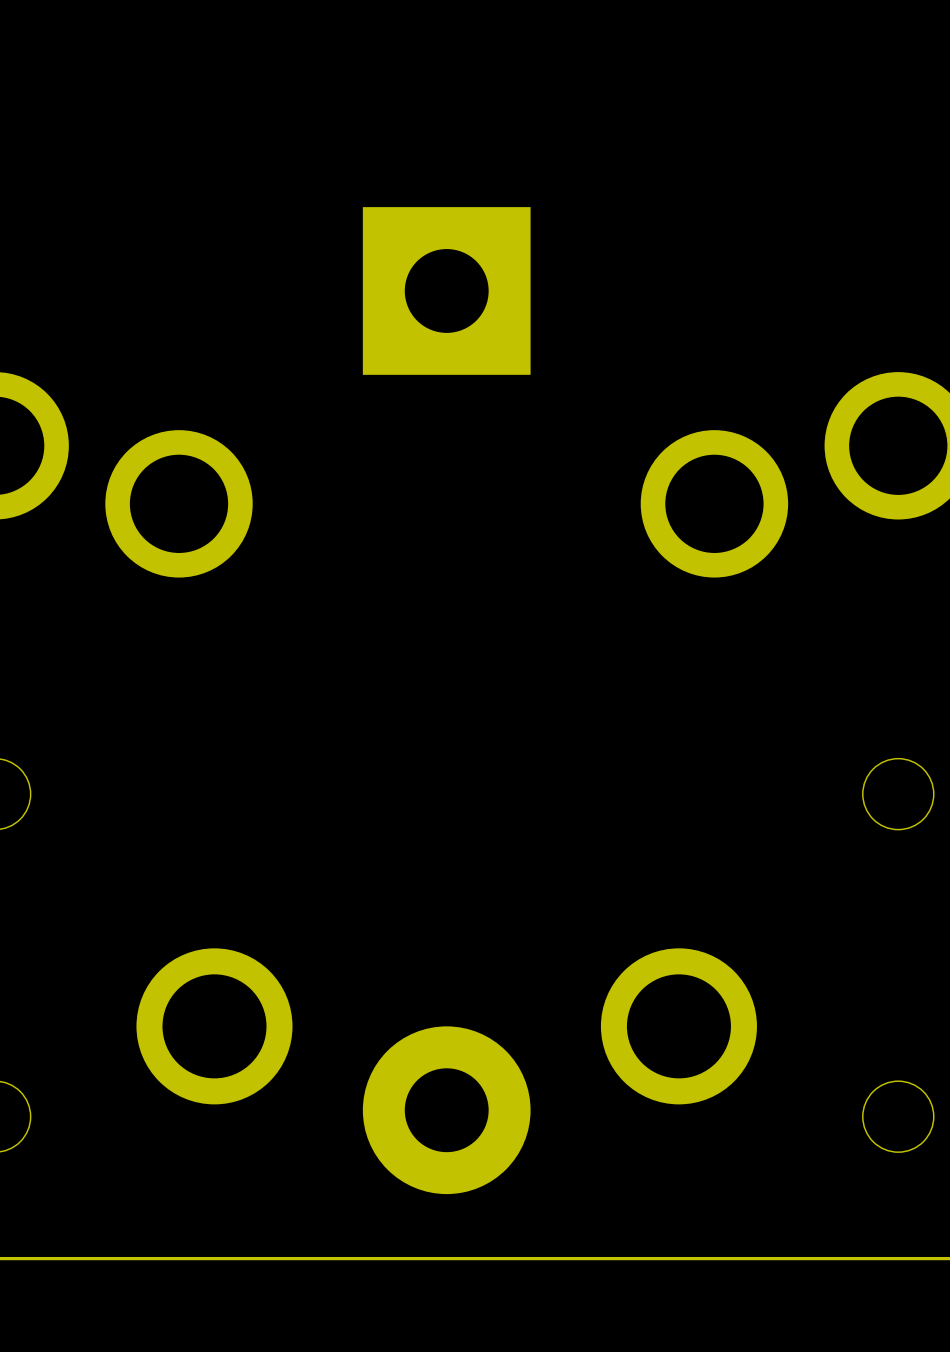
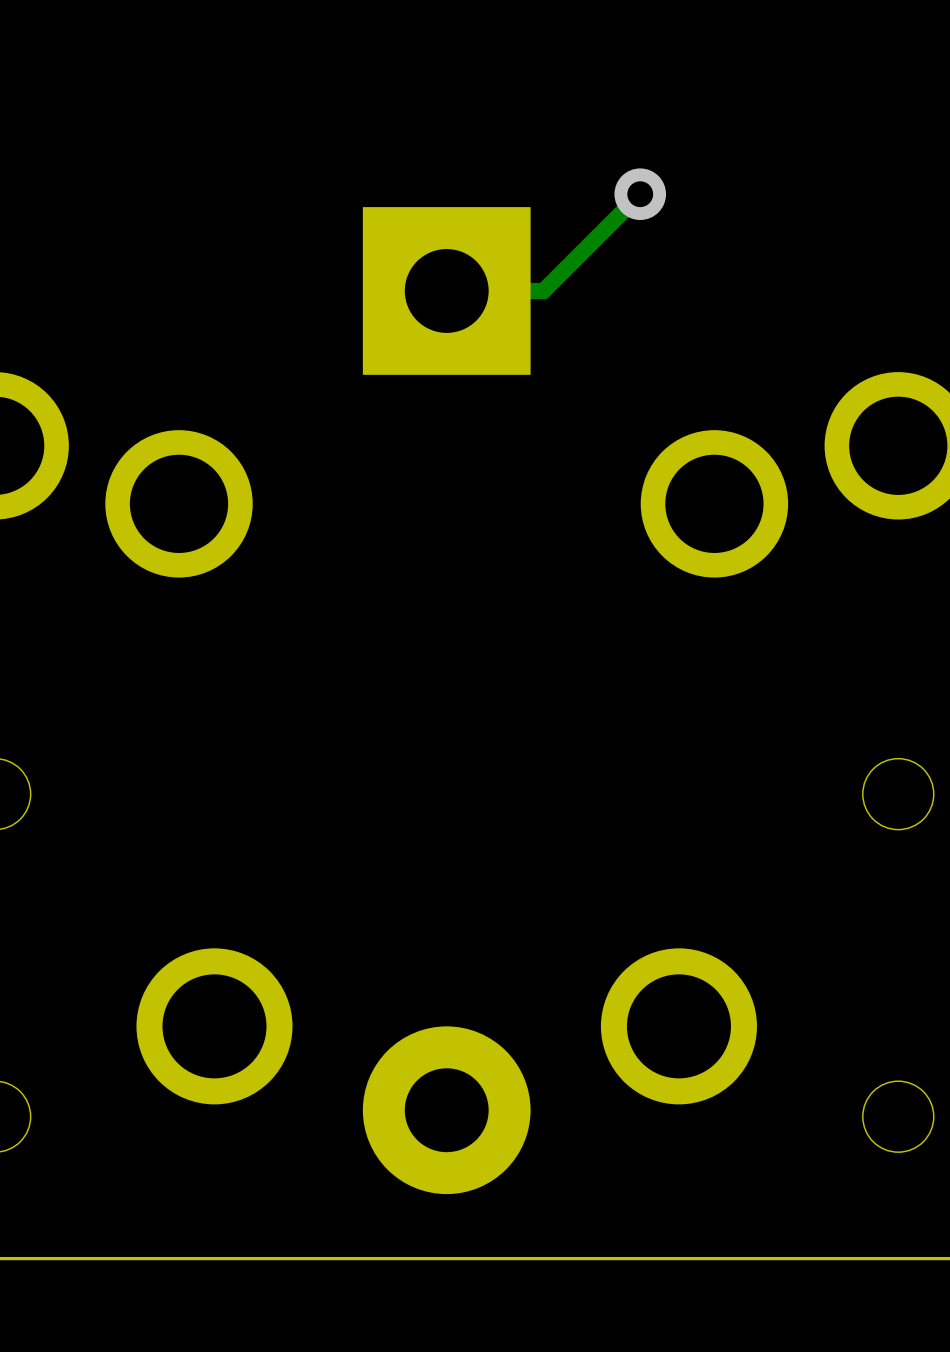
track: none -> (640, 194) (543, 290) (446, 290)
via: none -> (640, 194)

